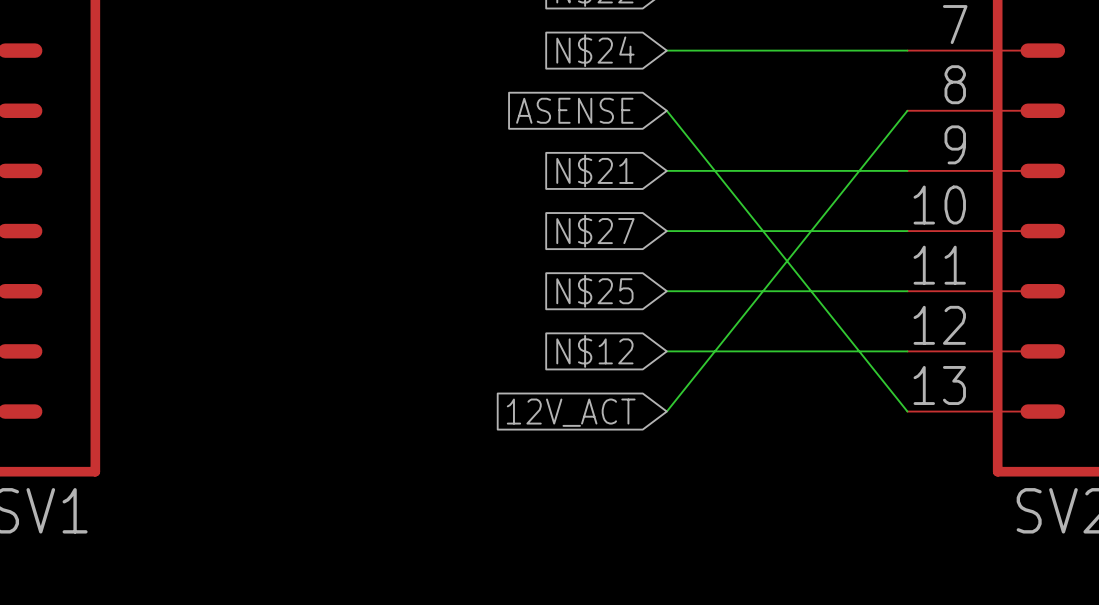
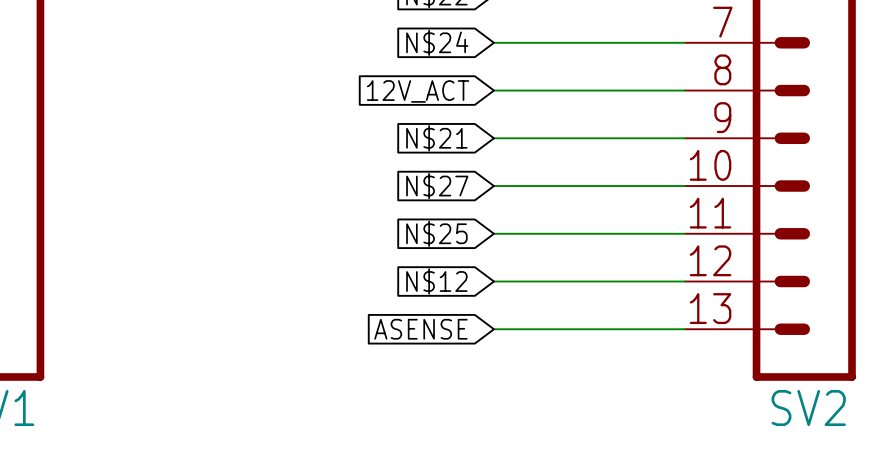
global label: ASENSE (574, 110) -> 12V_ACT (418, 91)
wire: (666, 110) (907, 411) -> (493, 90) (684, 90)
wire: (907, 110) (666, 411) -> (684, 329) (493, 329)
global label: 12V_ACT (571, 412) -> ASENSE (420, 329)

